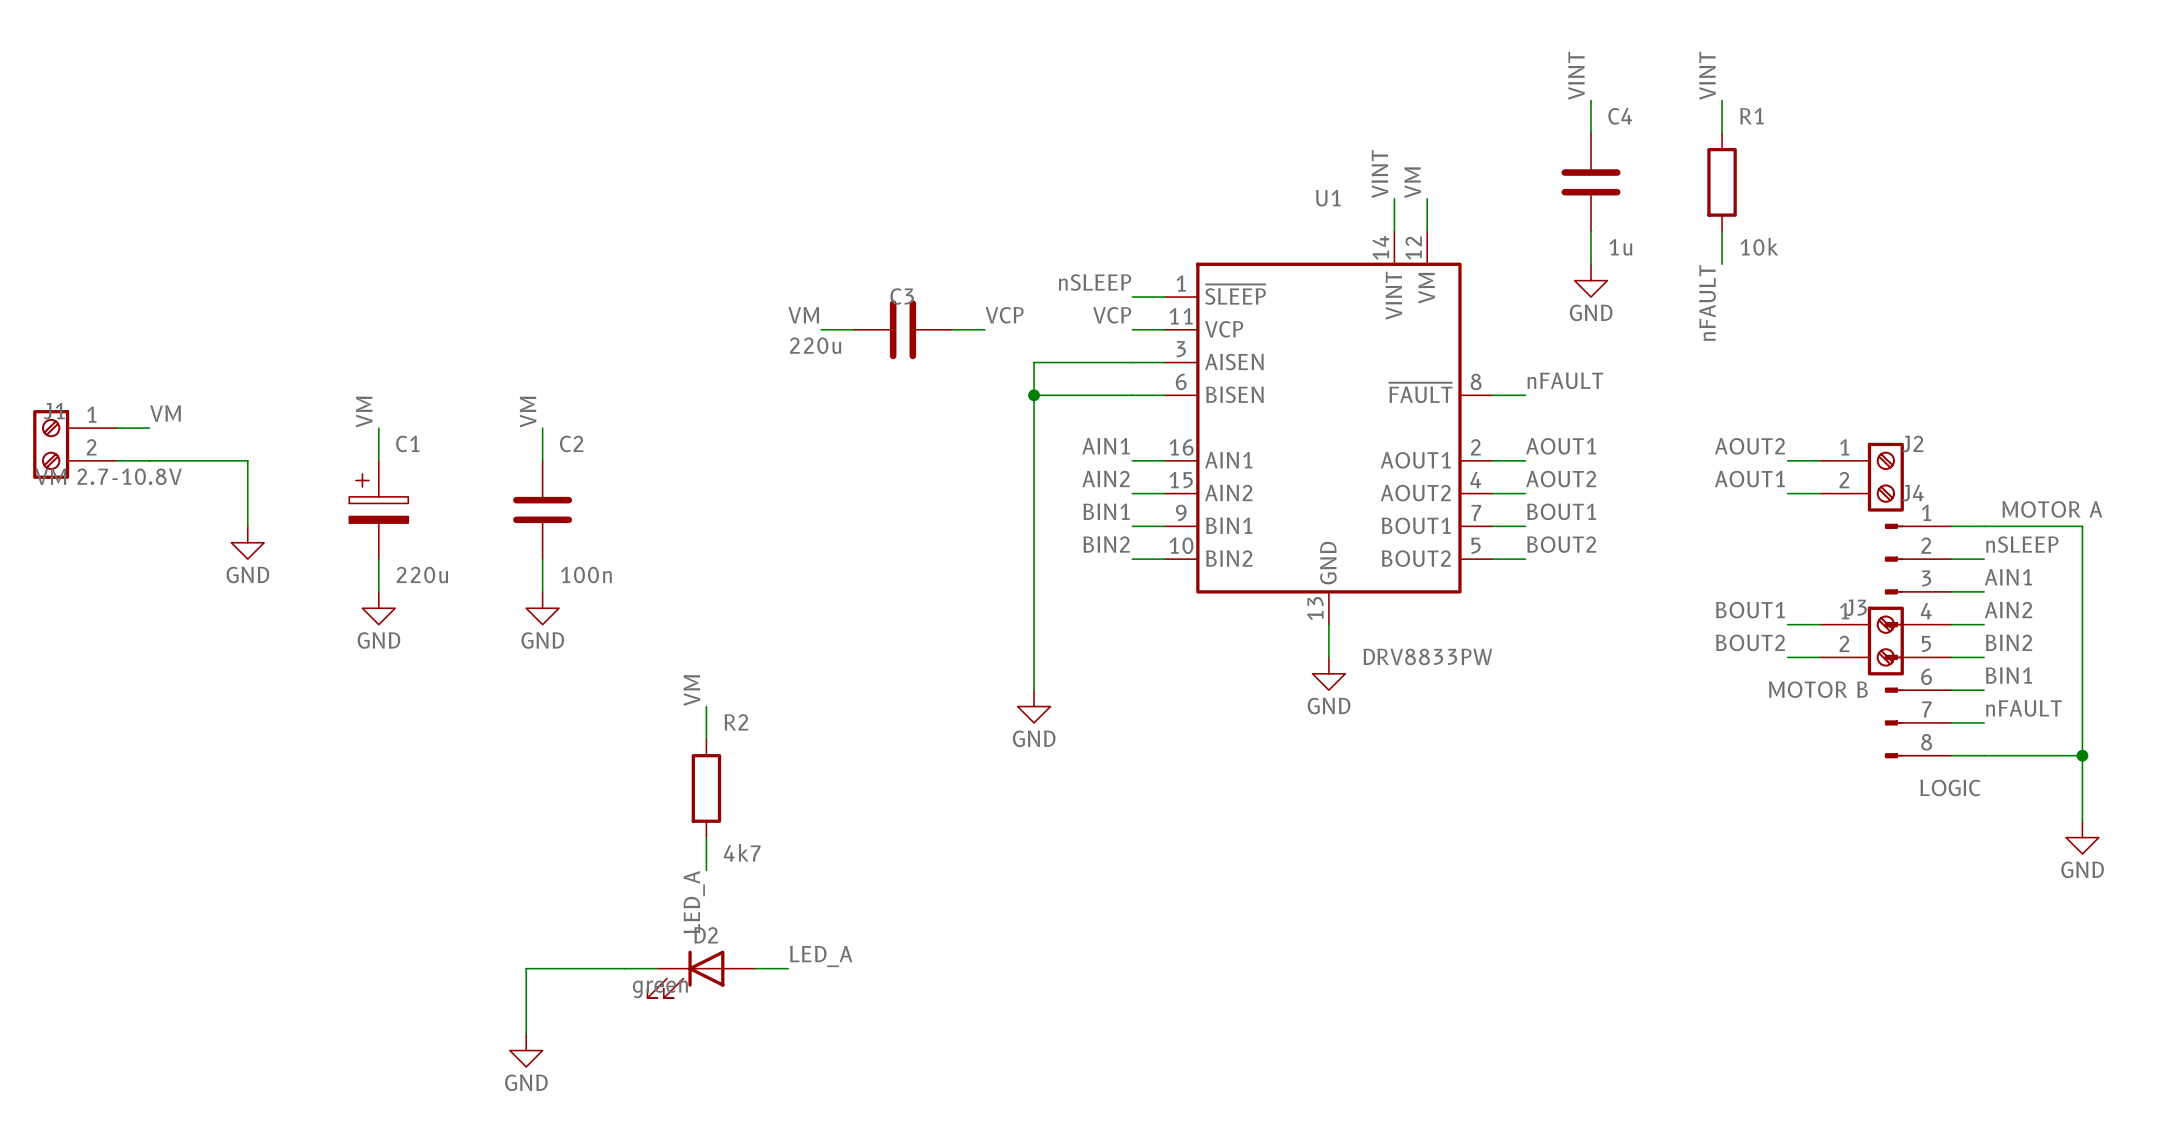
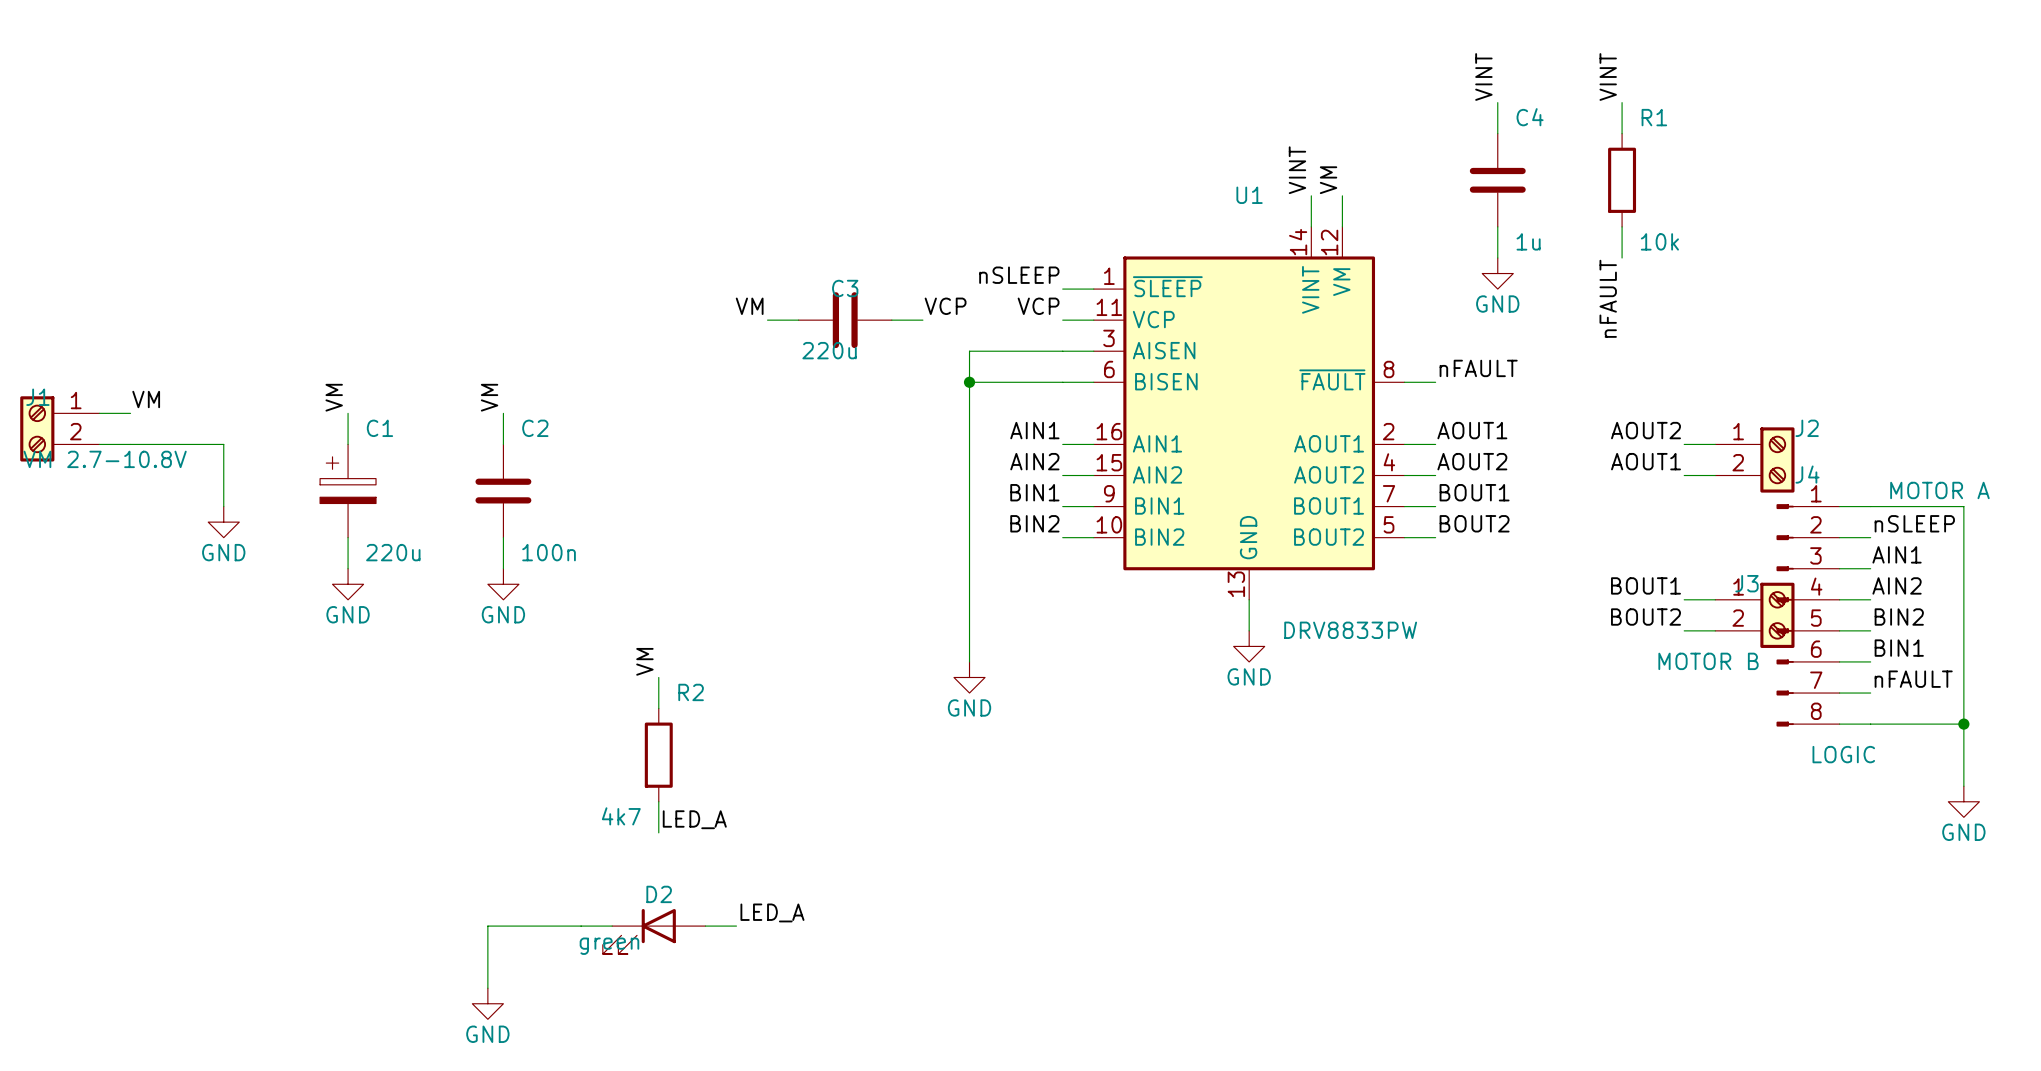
C3 value position: 220u (815, 345) -> 220u (829, 350)
R2 value position: 4k7 (742, 852) -> 4k7 (621, 816)
label rotation: 0° (694, 902) -> 90° clockwise (694, 819)

